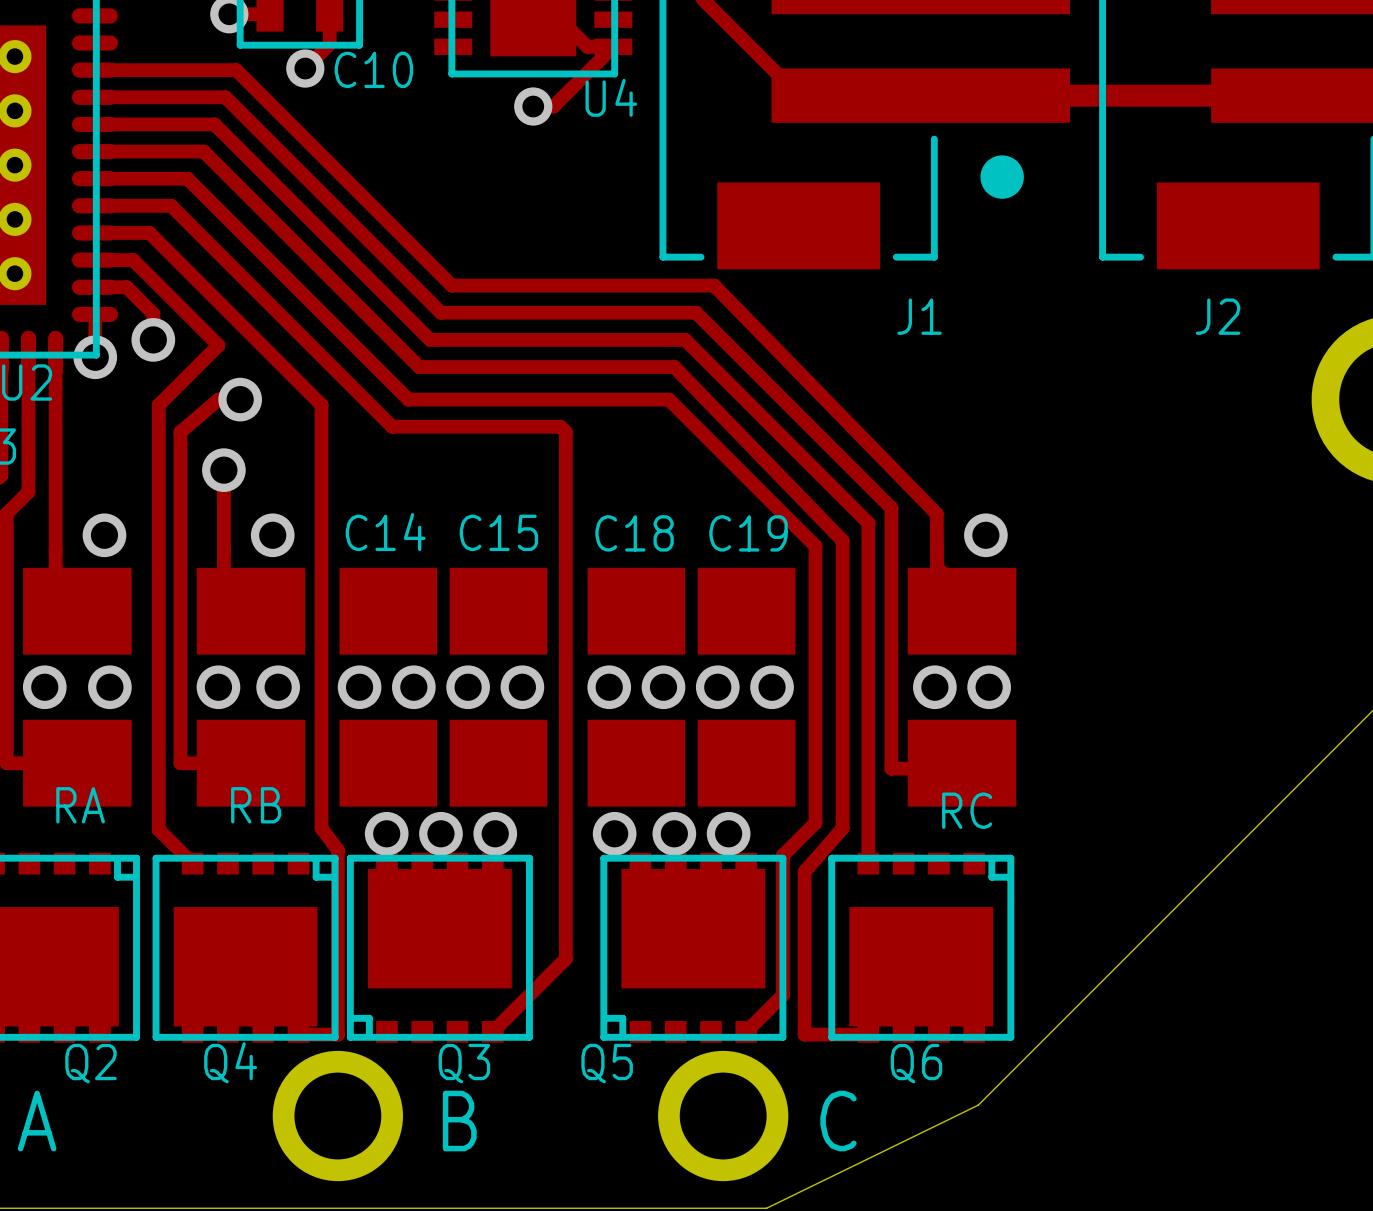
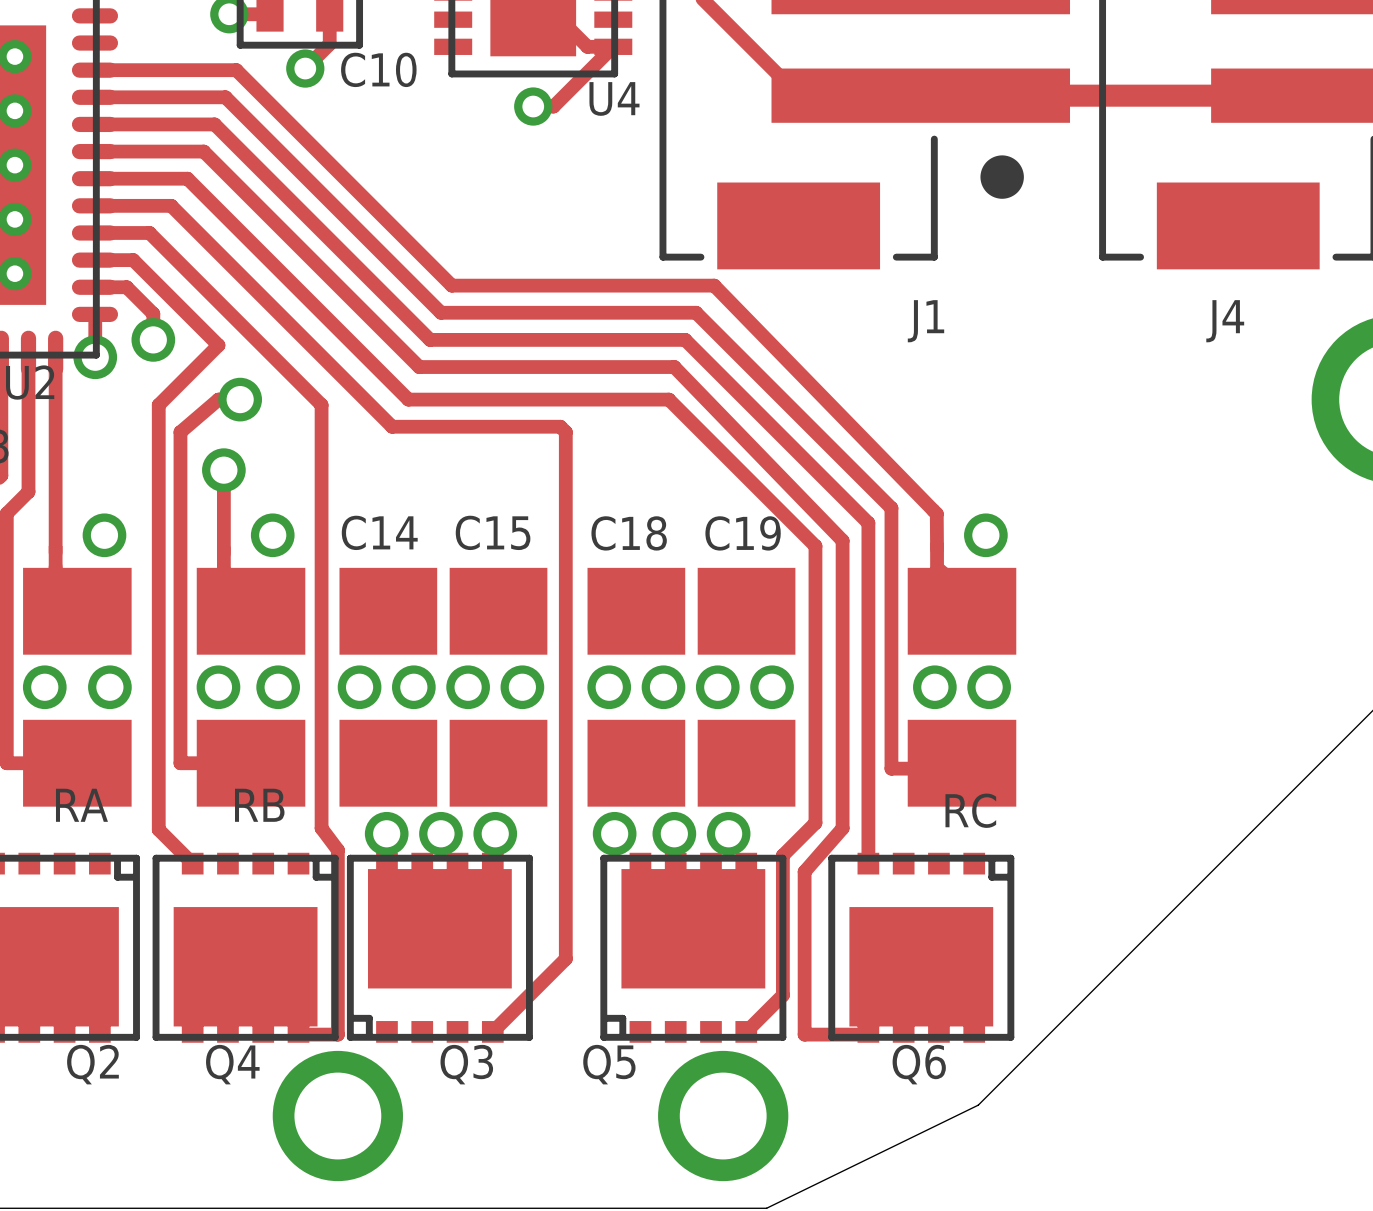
J2 name: J2 (1218, 316) -> J4 (1225, 321)
text: A (37, 1121) -> none
text: B (459, 1121) -> none
text: C (838, 1121) -> none

